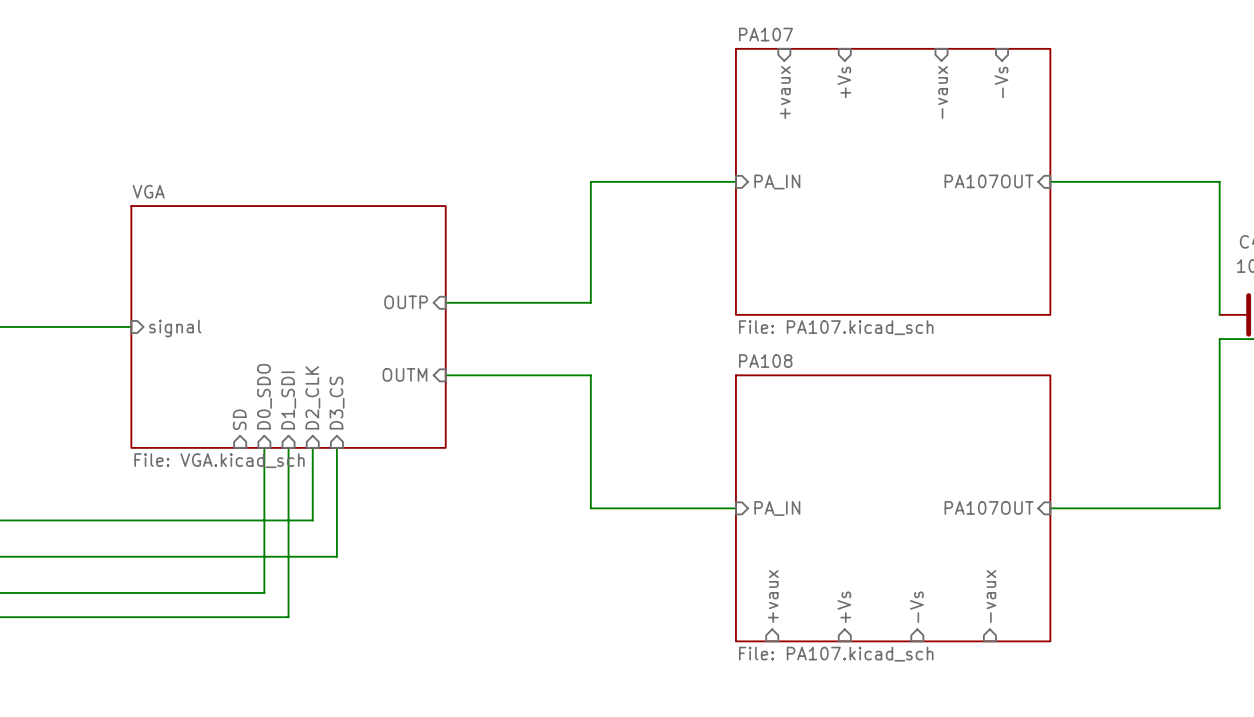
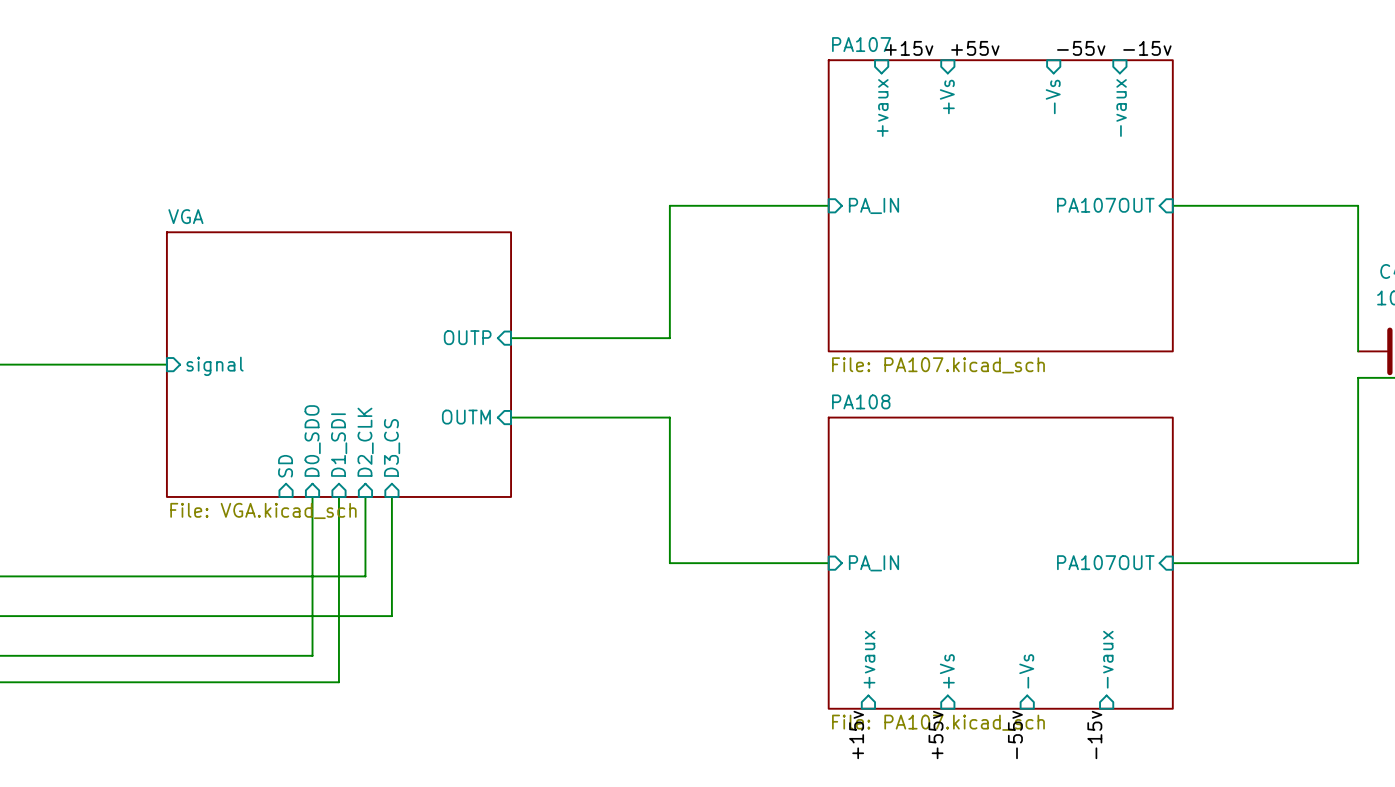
label: none -> +15v (909, 48)
label: none -> +55v (975, 48)
label: none -> -55v (1081, 48)
label: none -> -15v (1147, 48)
sheet pin: -Vs (1001, 82) -> -vaux (1121, 108)
sheet pin: -vaux (943, 92) -> -Vs (1053, 96)
label: none -> +15v (856, 735)
label: none -> +55v (936, 735)
label: none -> -55v (1015, 735)
label: none -> -15v (1094, 735)

